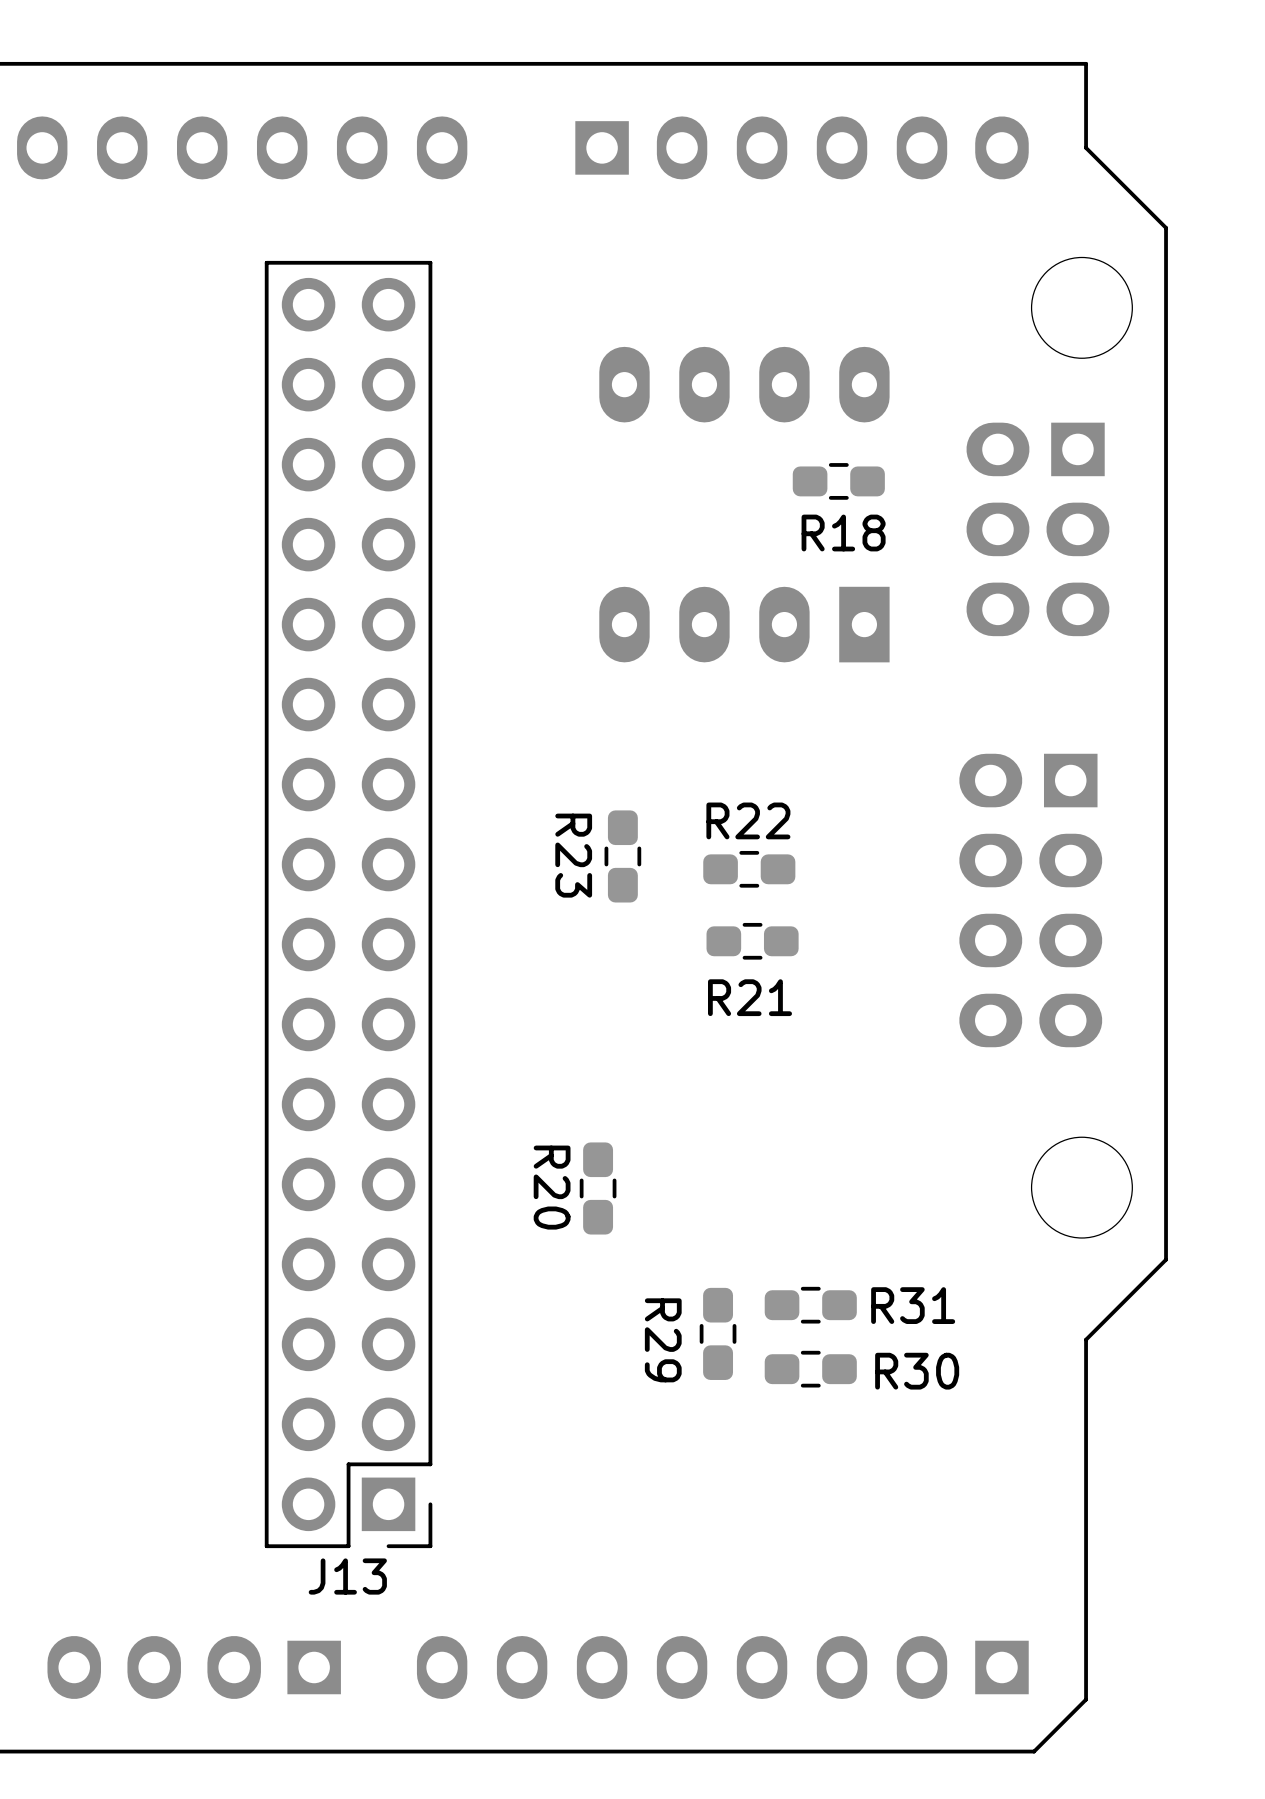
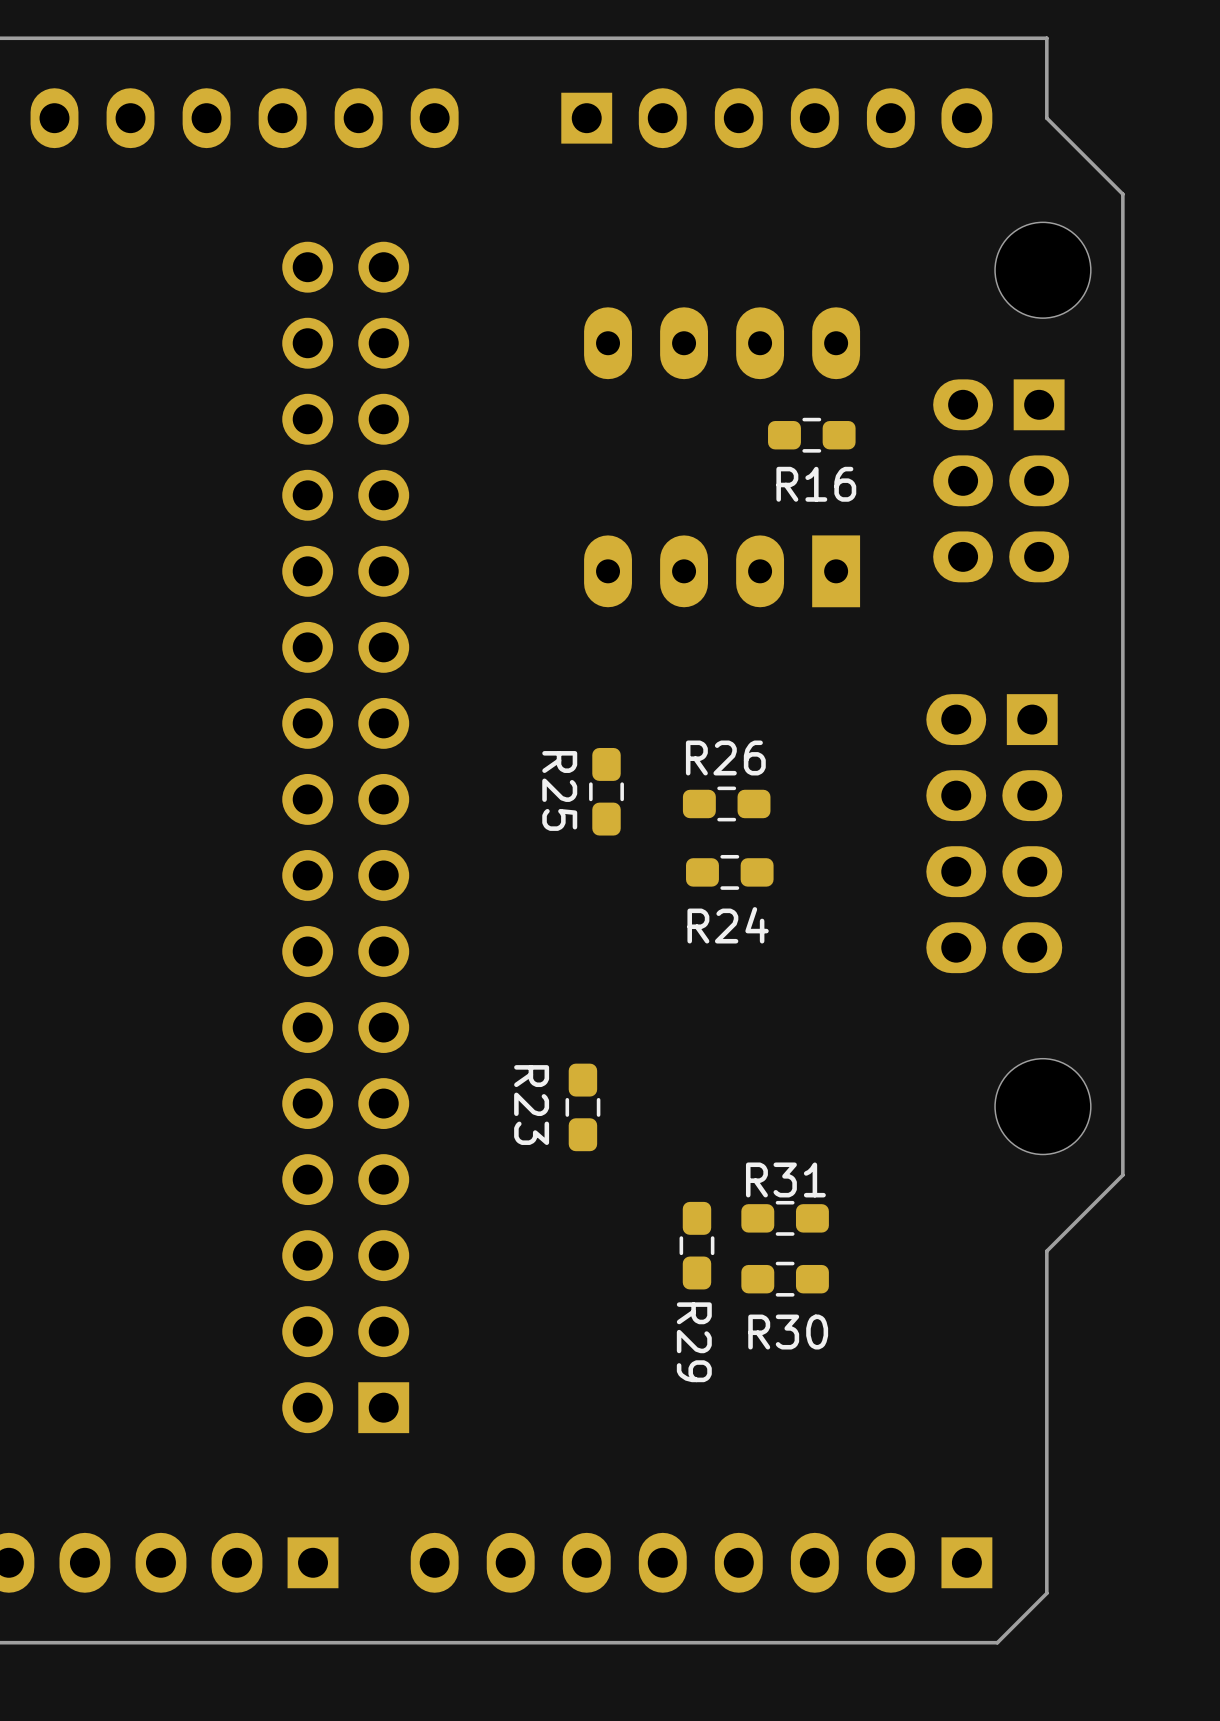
R18 name: R18 (843, 533) -> R16 (816, 484)
R22 name: R22 (748, 820) -> R26 (725, 757)
R23 name: R23 (573, 855) -> R25 (559, 790)
J13: (348, 904) -> none
R21 name: R21 (750, 997) -> R24 (728, 925)
R20 name: R20 (552, 1187) -> R23 (531, 1105)
R31 name position: R31 (913, 1305) -> R31 (785, 1179)
R29 name position: R29 (663, 1340) -> R29 (694, 1342)
R30 name position: R30 (917, 1371) -> R30 (788, 1332)

